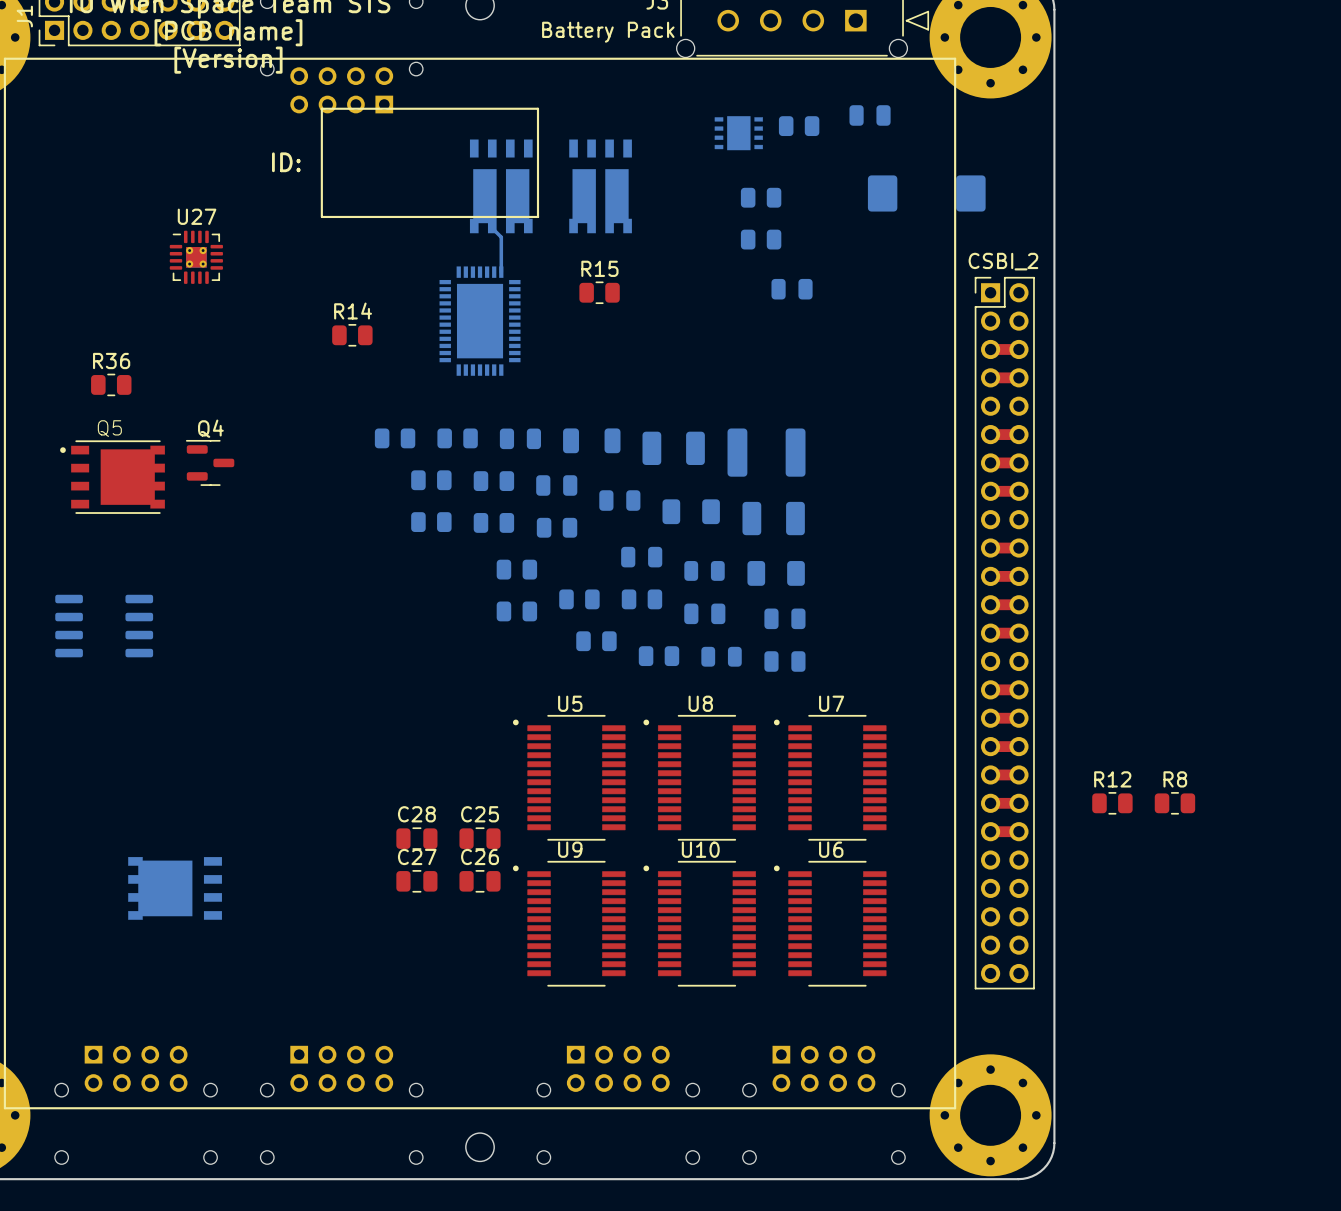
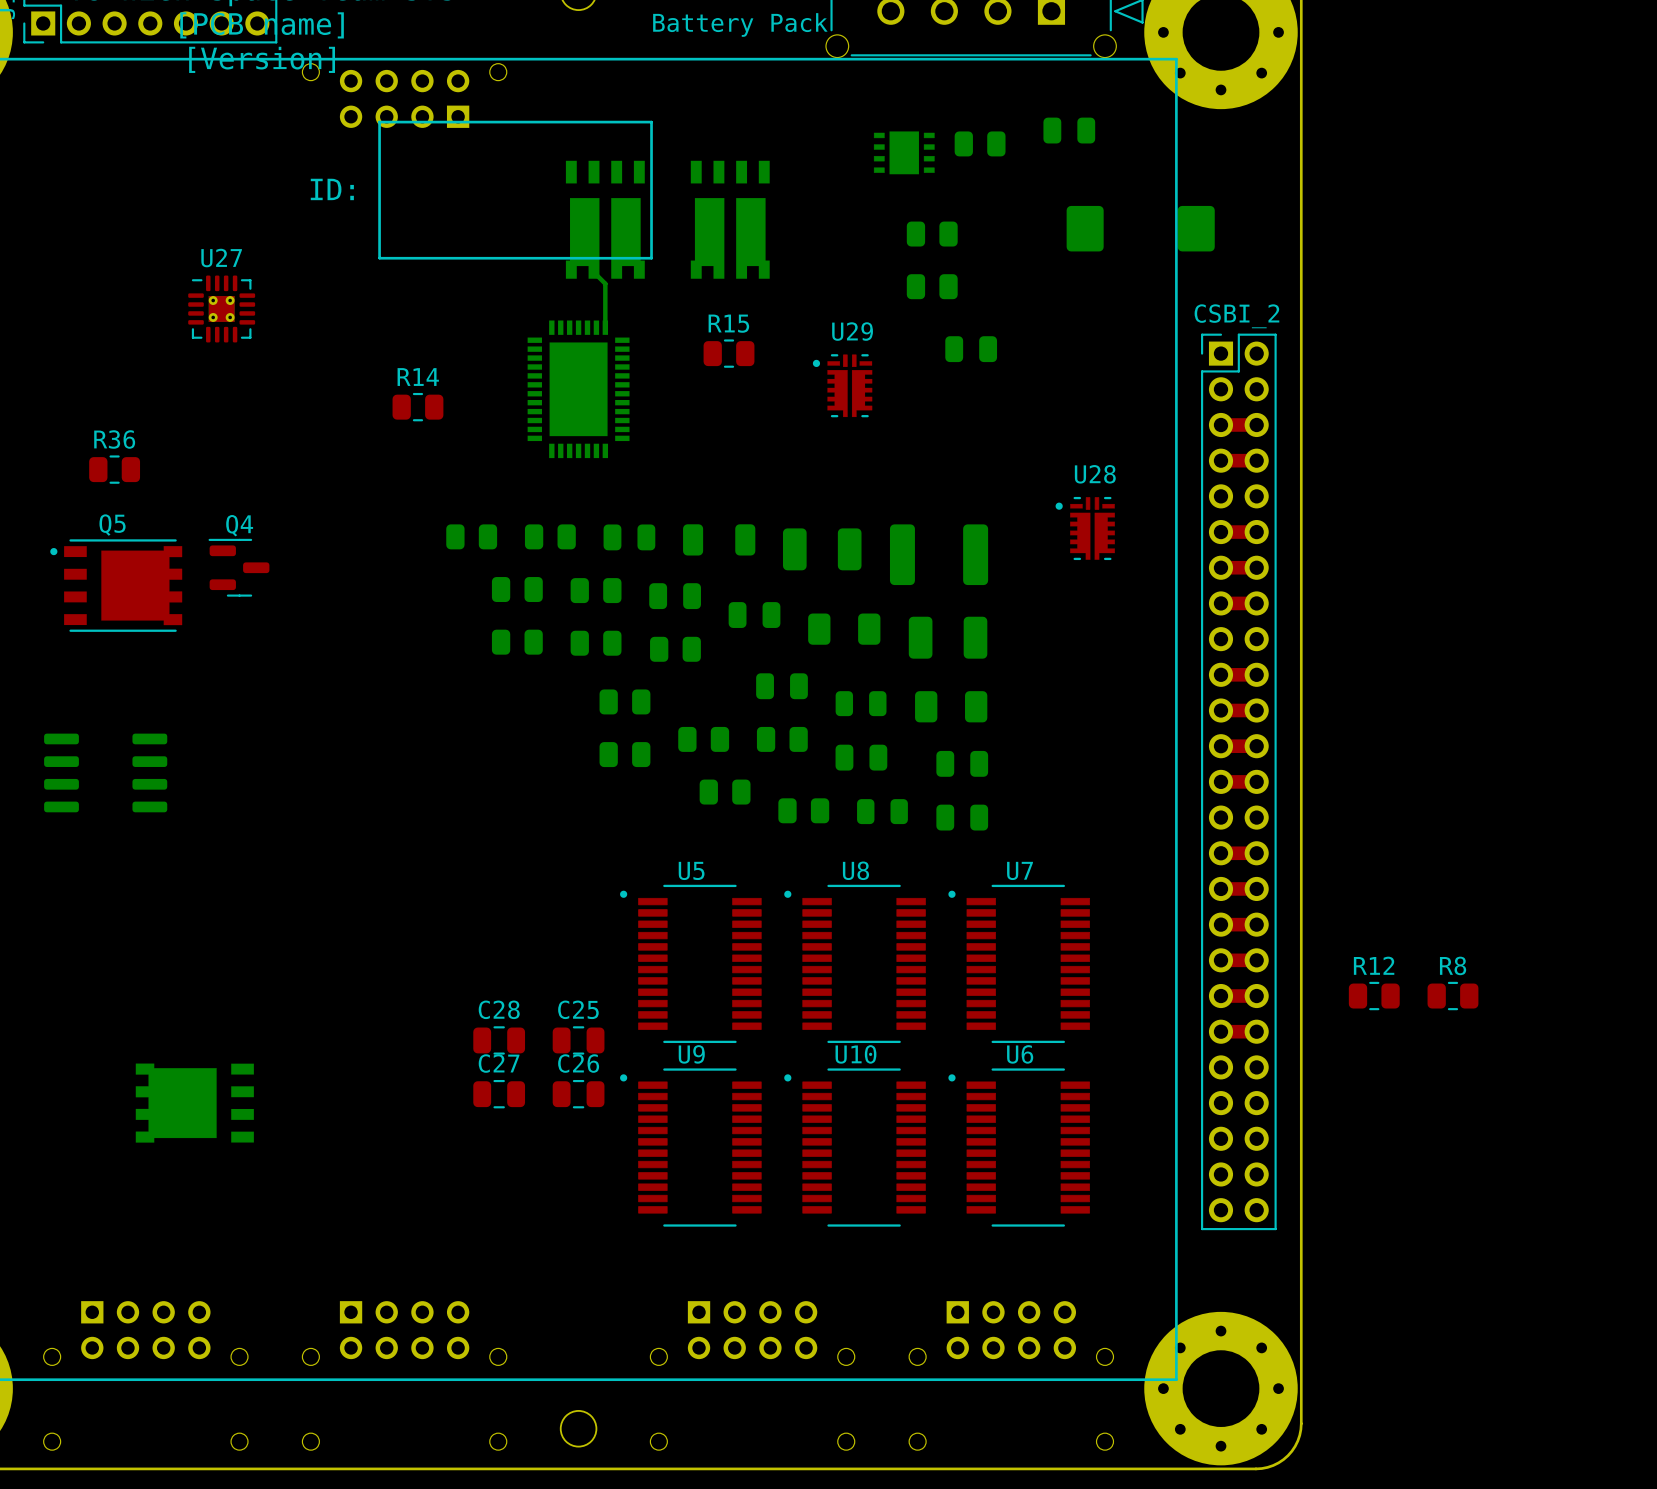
U29: none -> (842, 385)
U28: none -> (1085, 528)

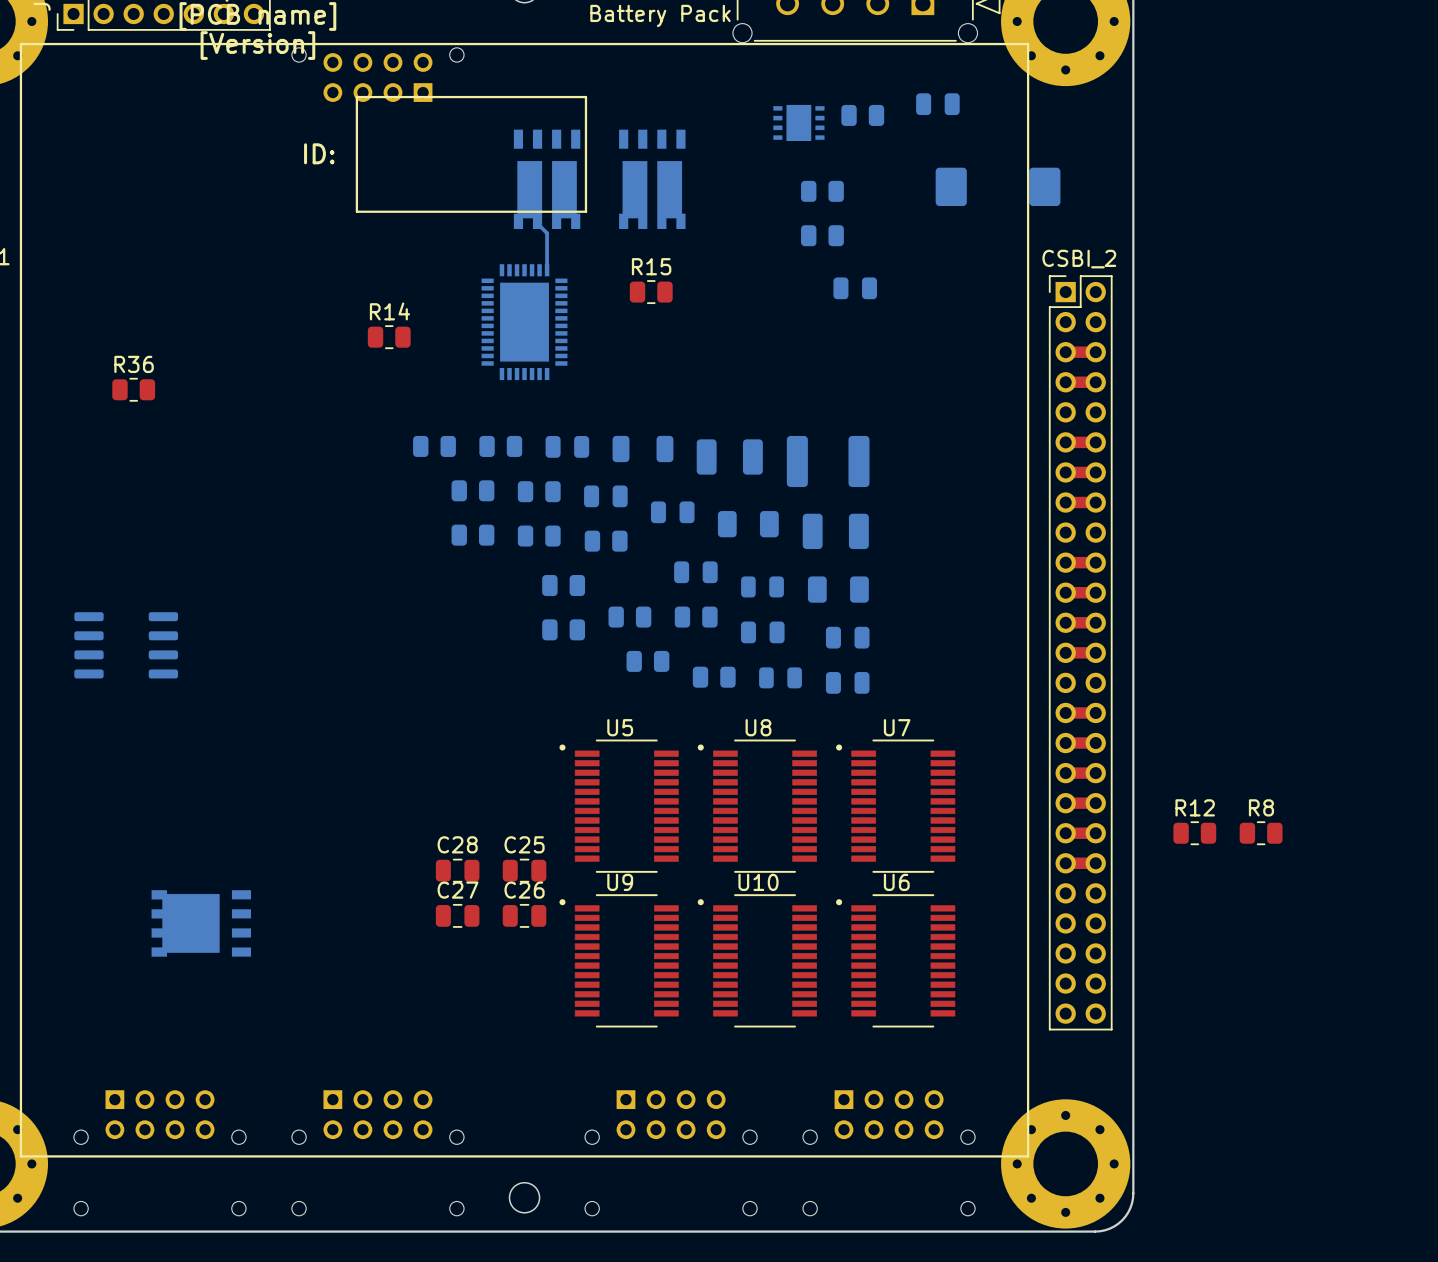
U27: (221, 308) -> none
U29: (842, 385) -> none
U28: (1085, 528) -> none
Q4: (238, 567) -> none
Q5: (116, 585) -> none

